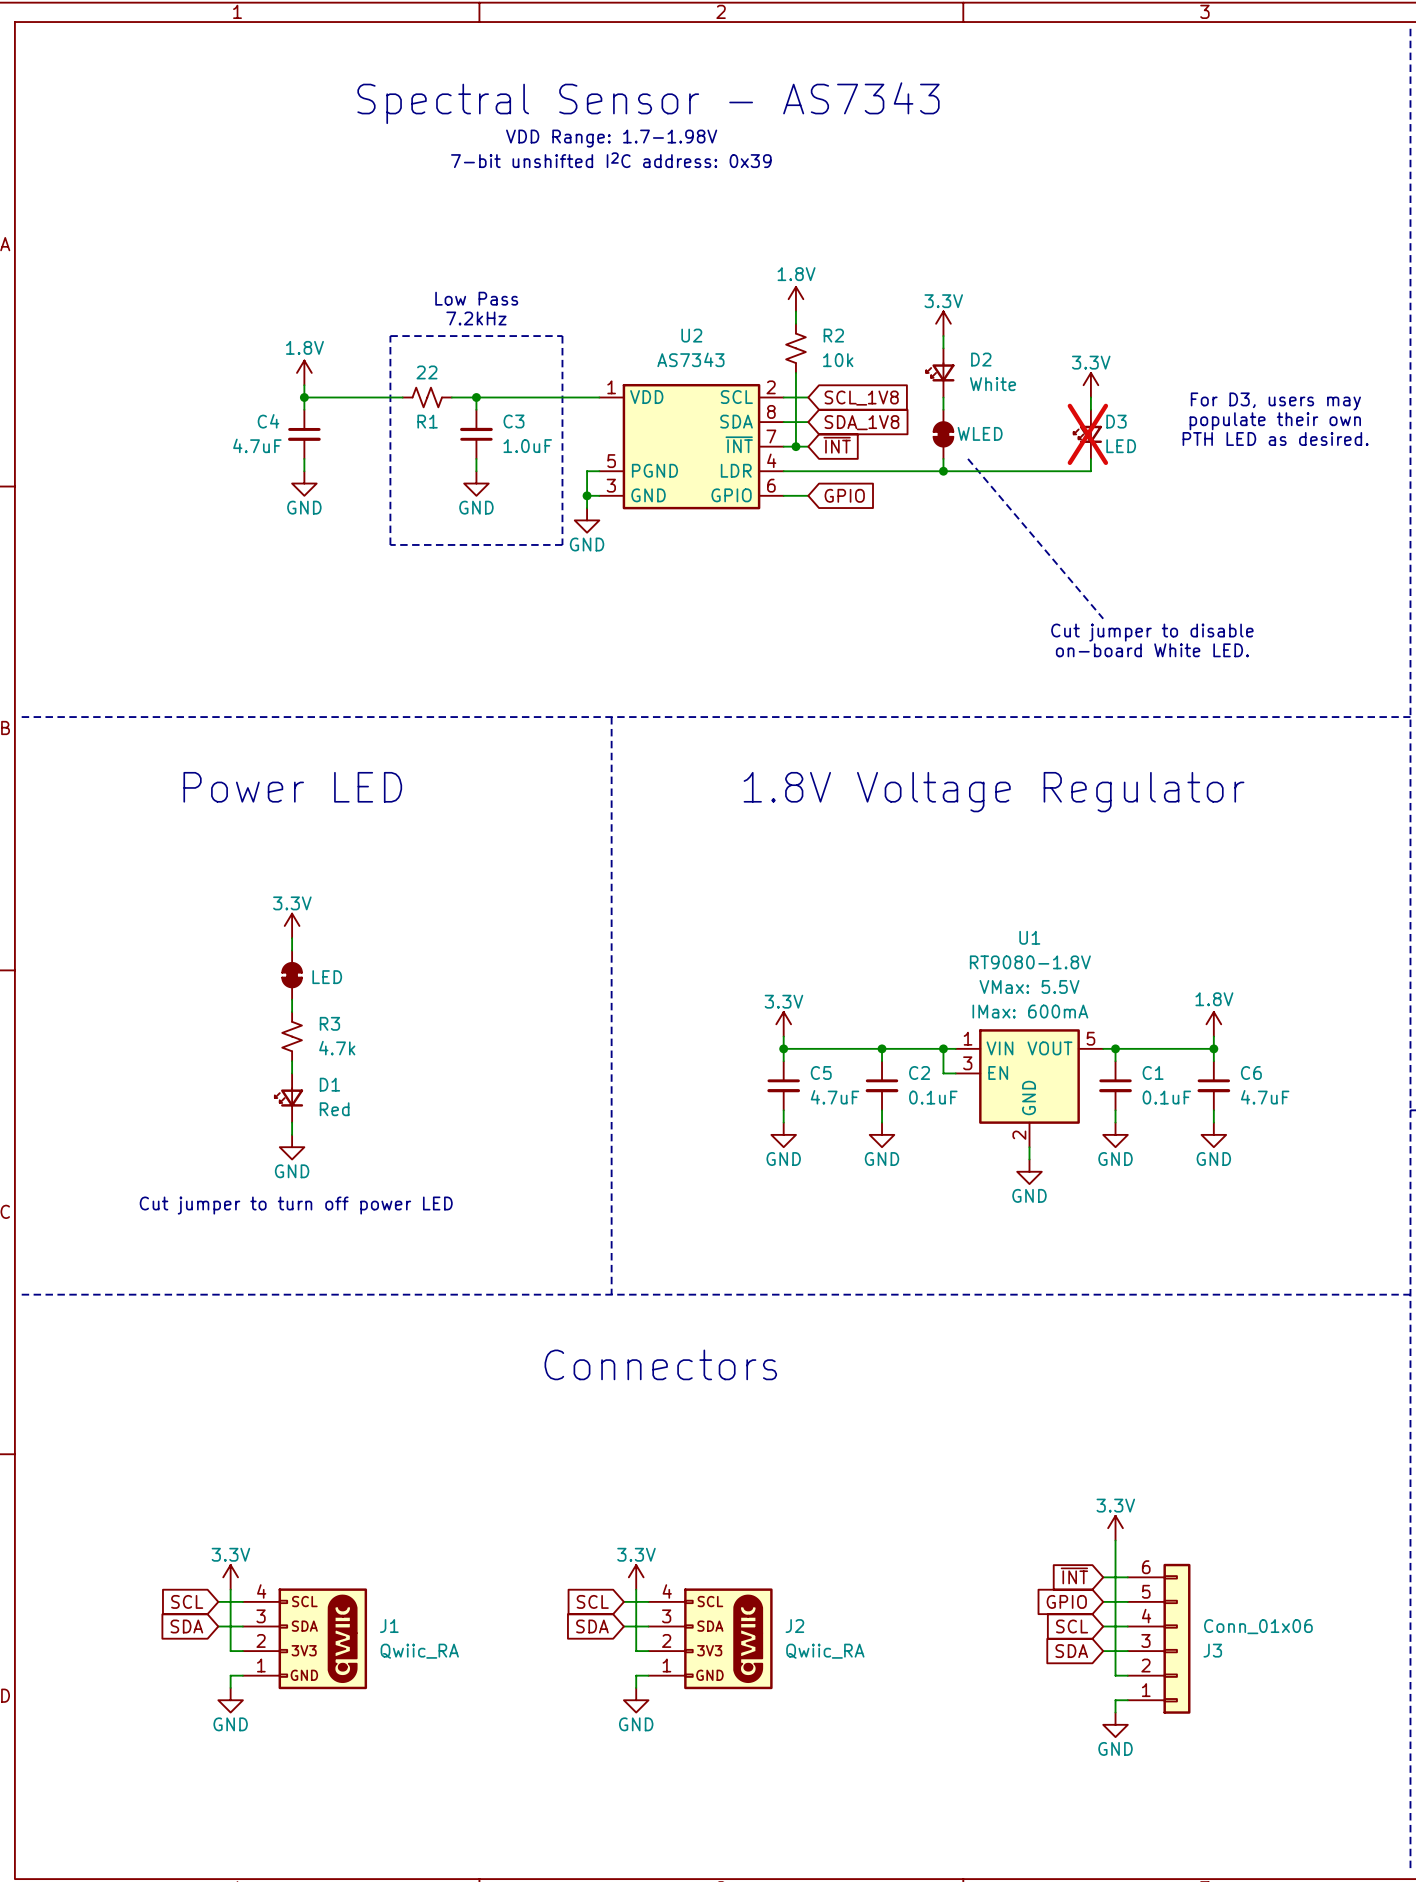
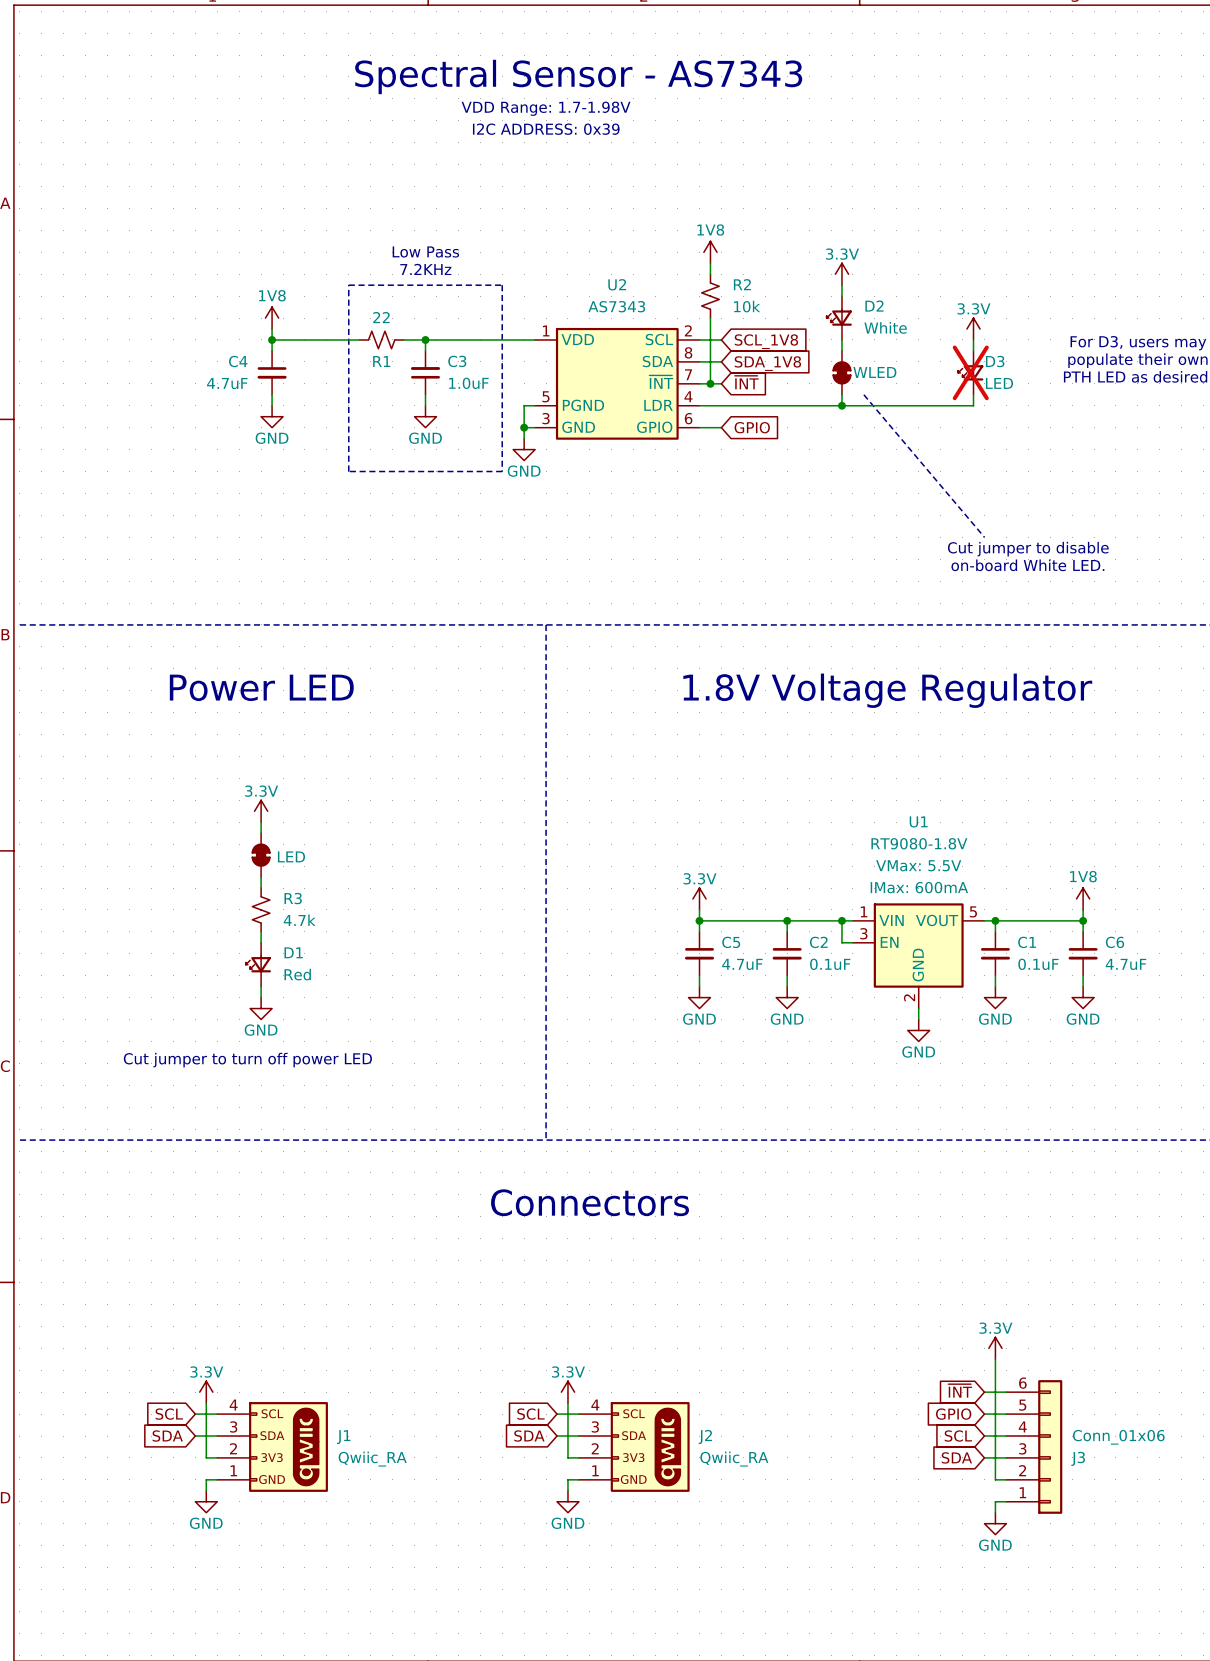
text: 7-bit unshifted I2C address: 0x39 (611, 160) -> I2C ADDRESS: 0x39 (546, 129)
power symbol: 1.8V (795, 299) -> 1V8 (710, 252)
text: 7.2kHz (476, 318) -> 7.2KHz (425, 269)
power symbol: 1.8V (304, 372) -> 1V8 (272, 318)
power symbol: 1.8V (1213, 1024) -> 1V8 (1083, 898)

